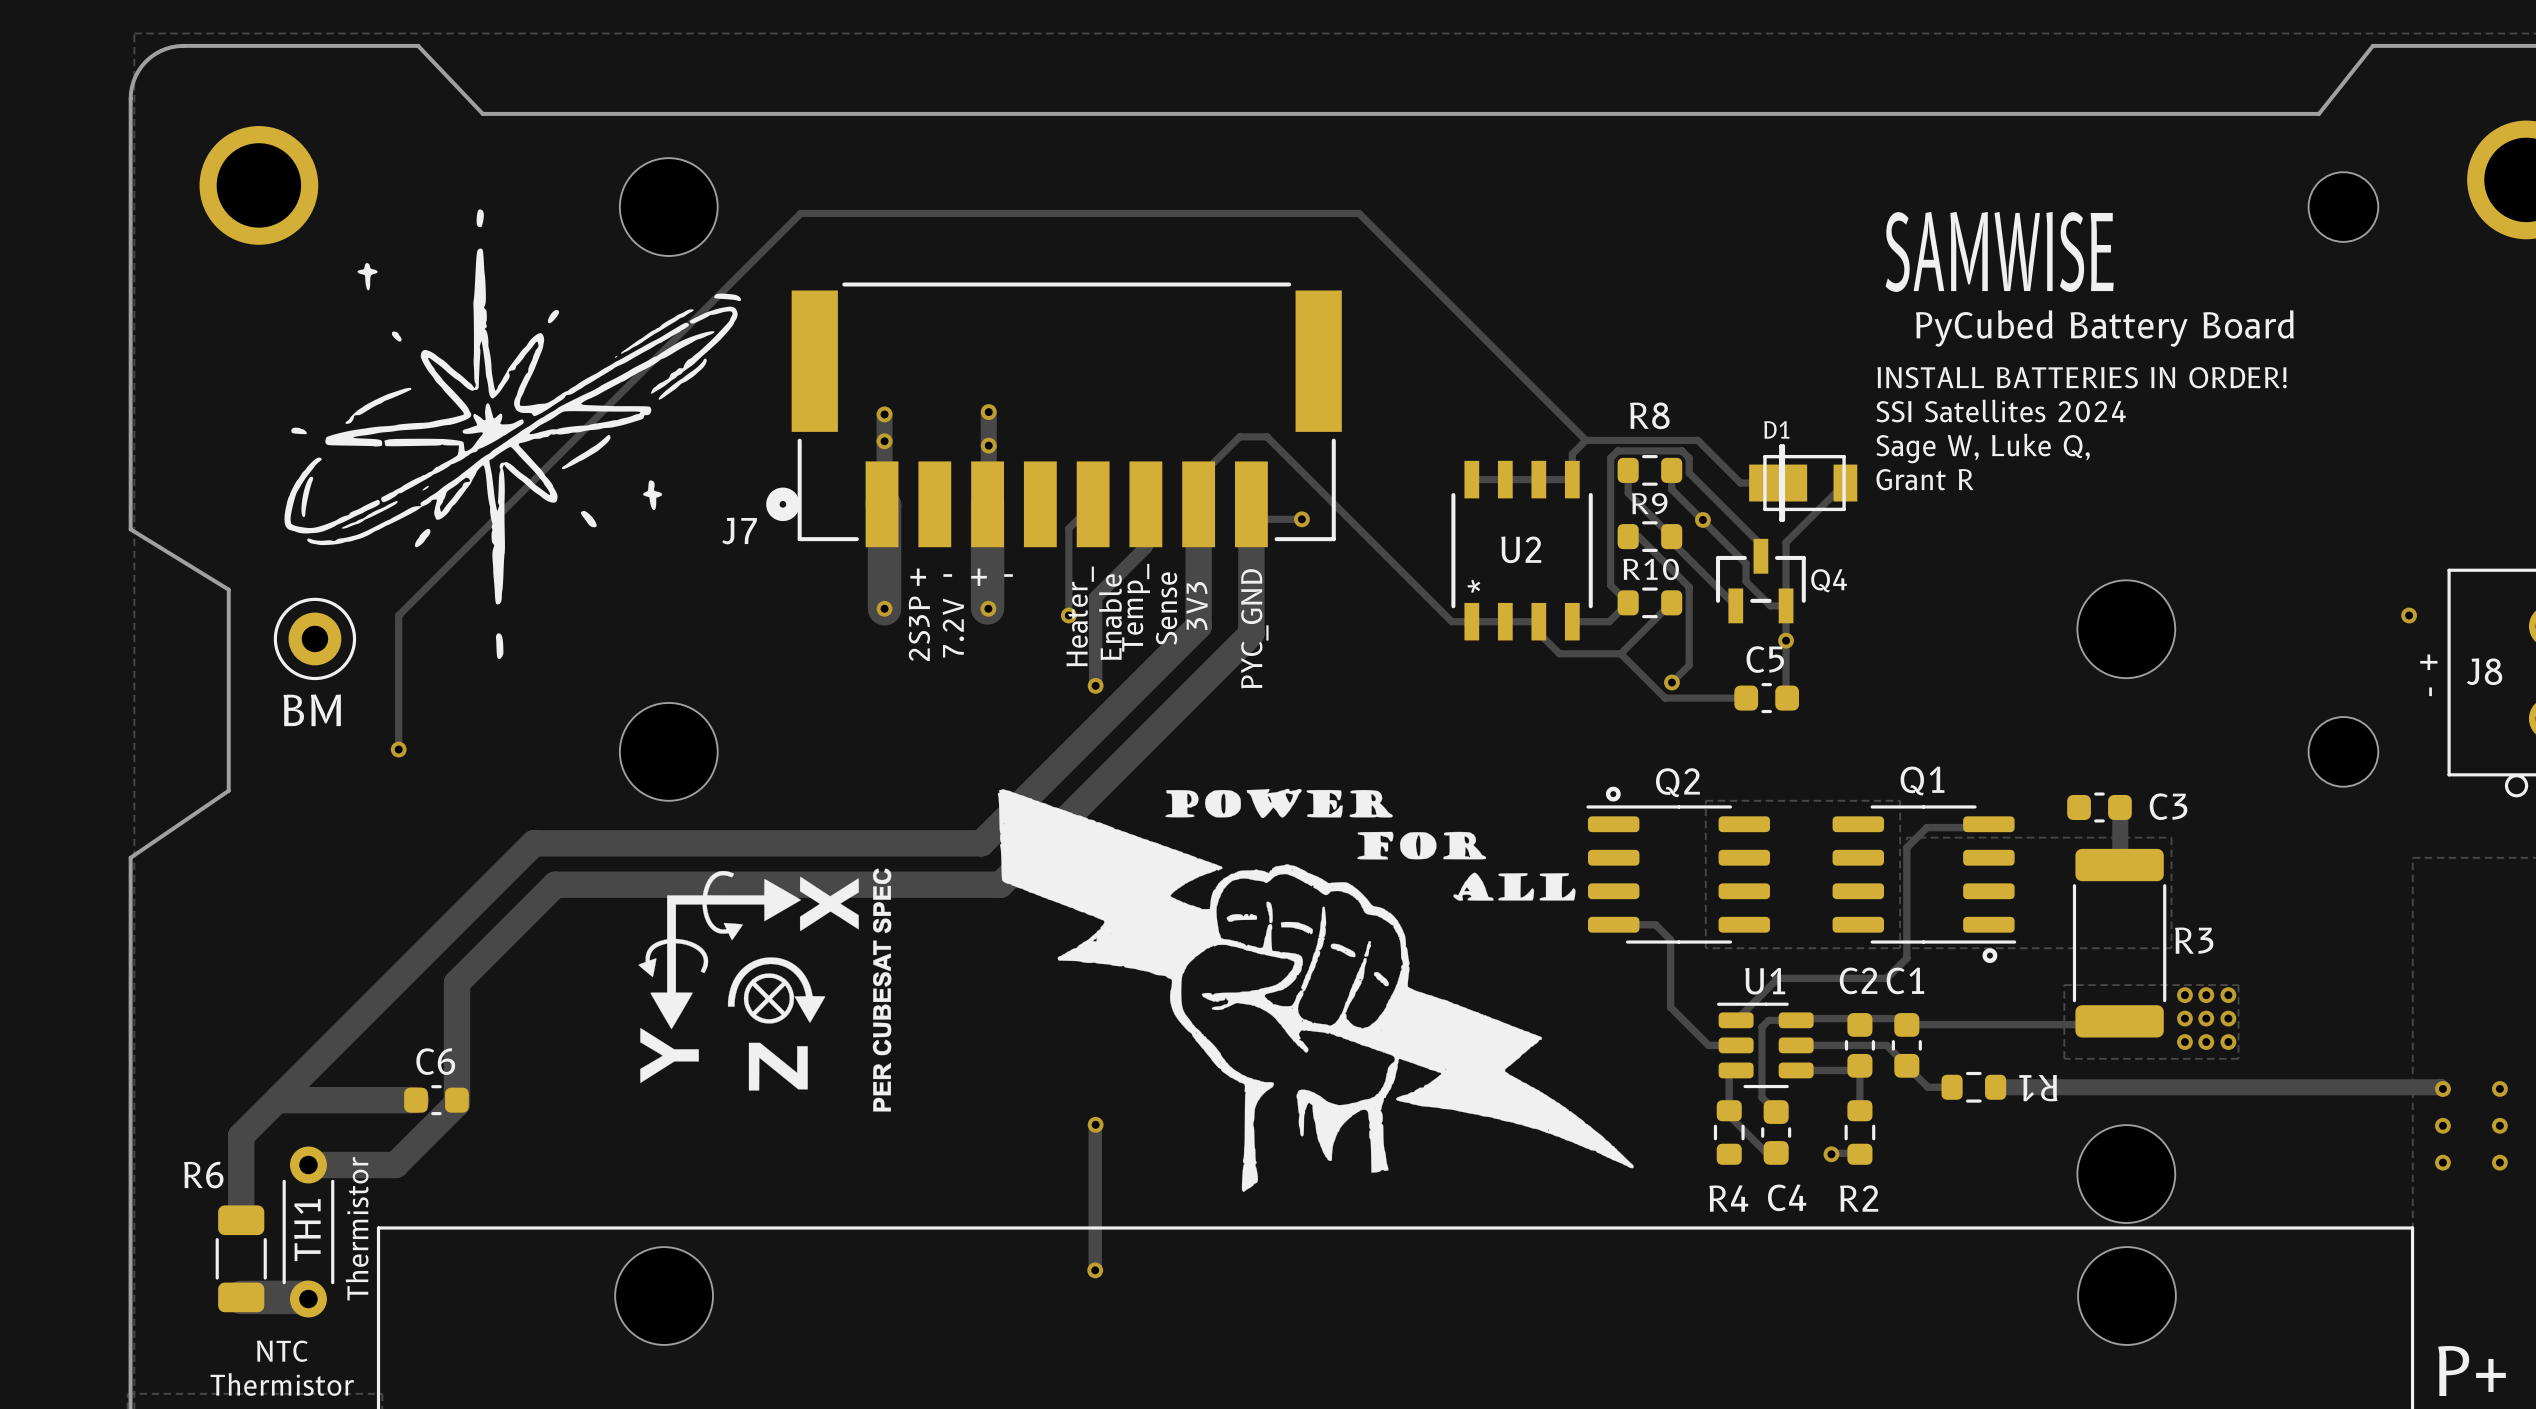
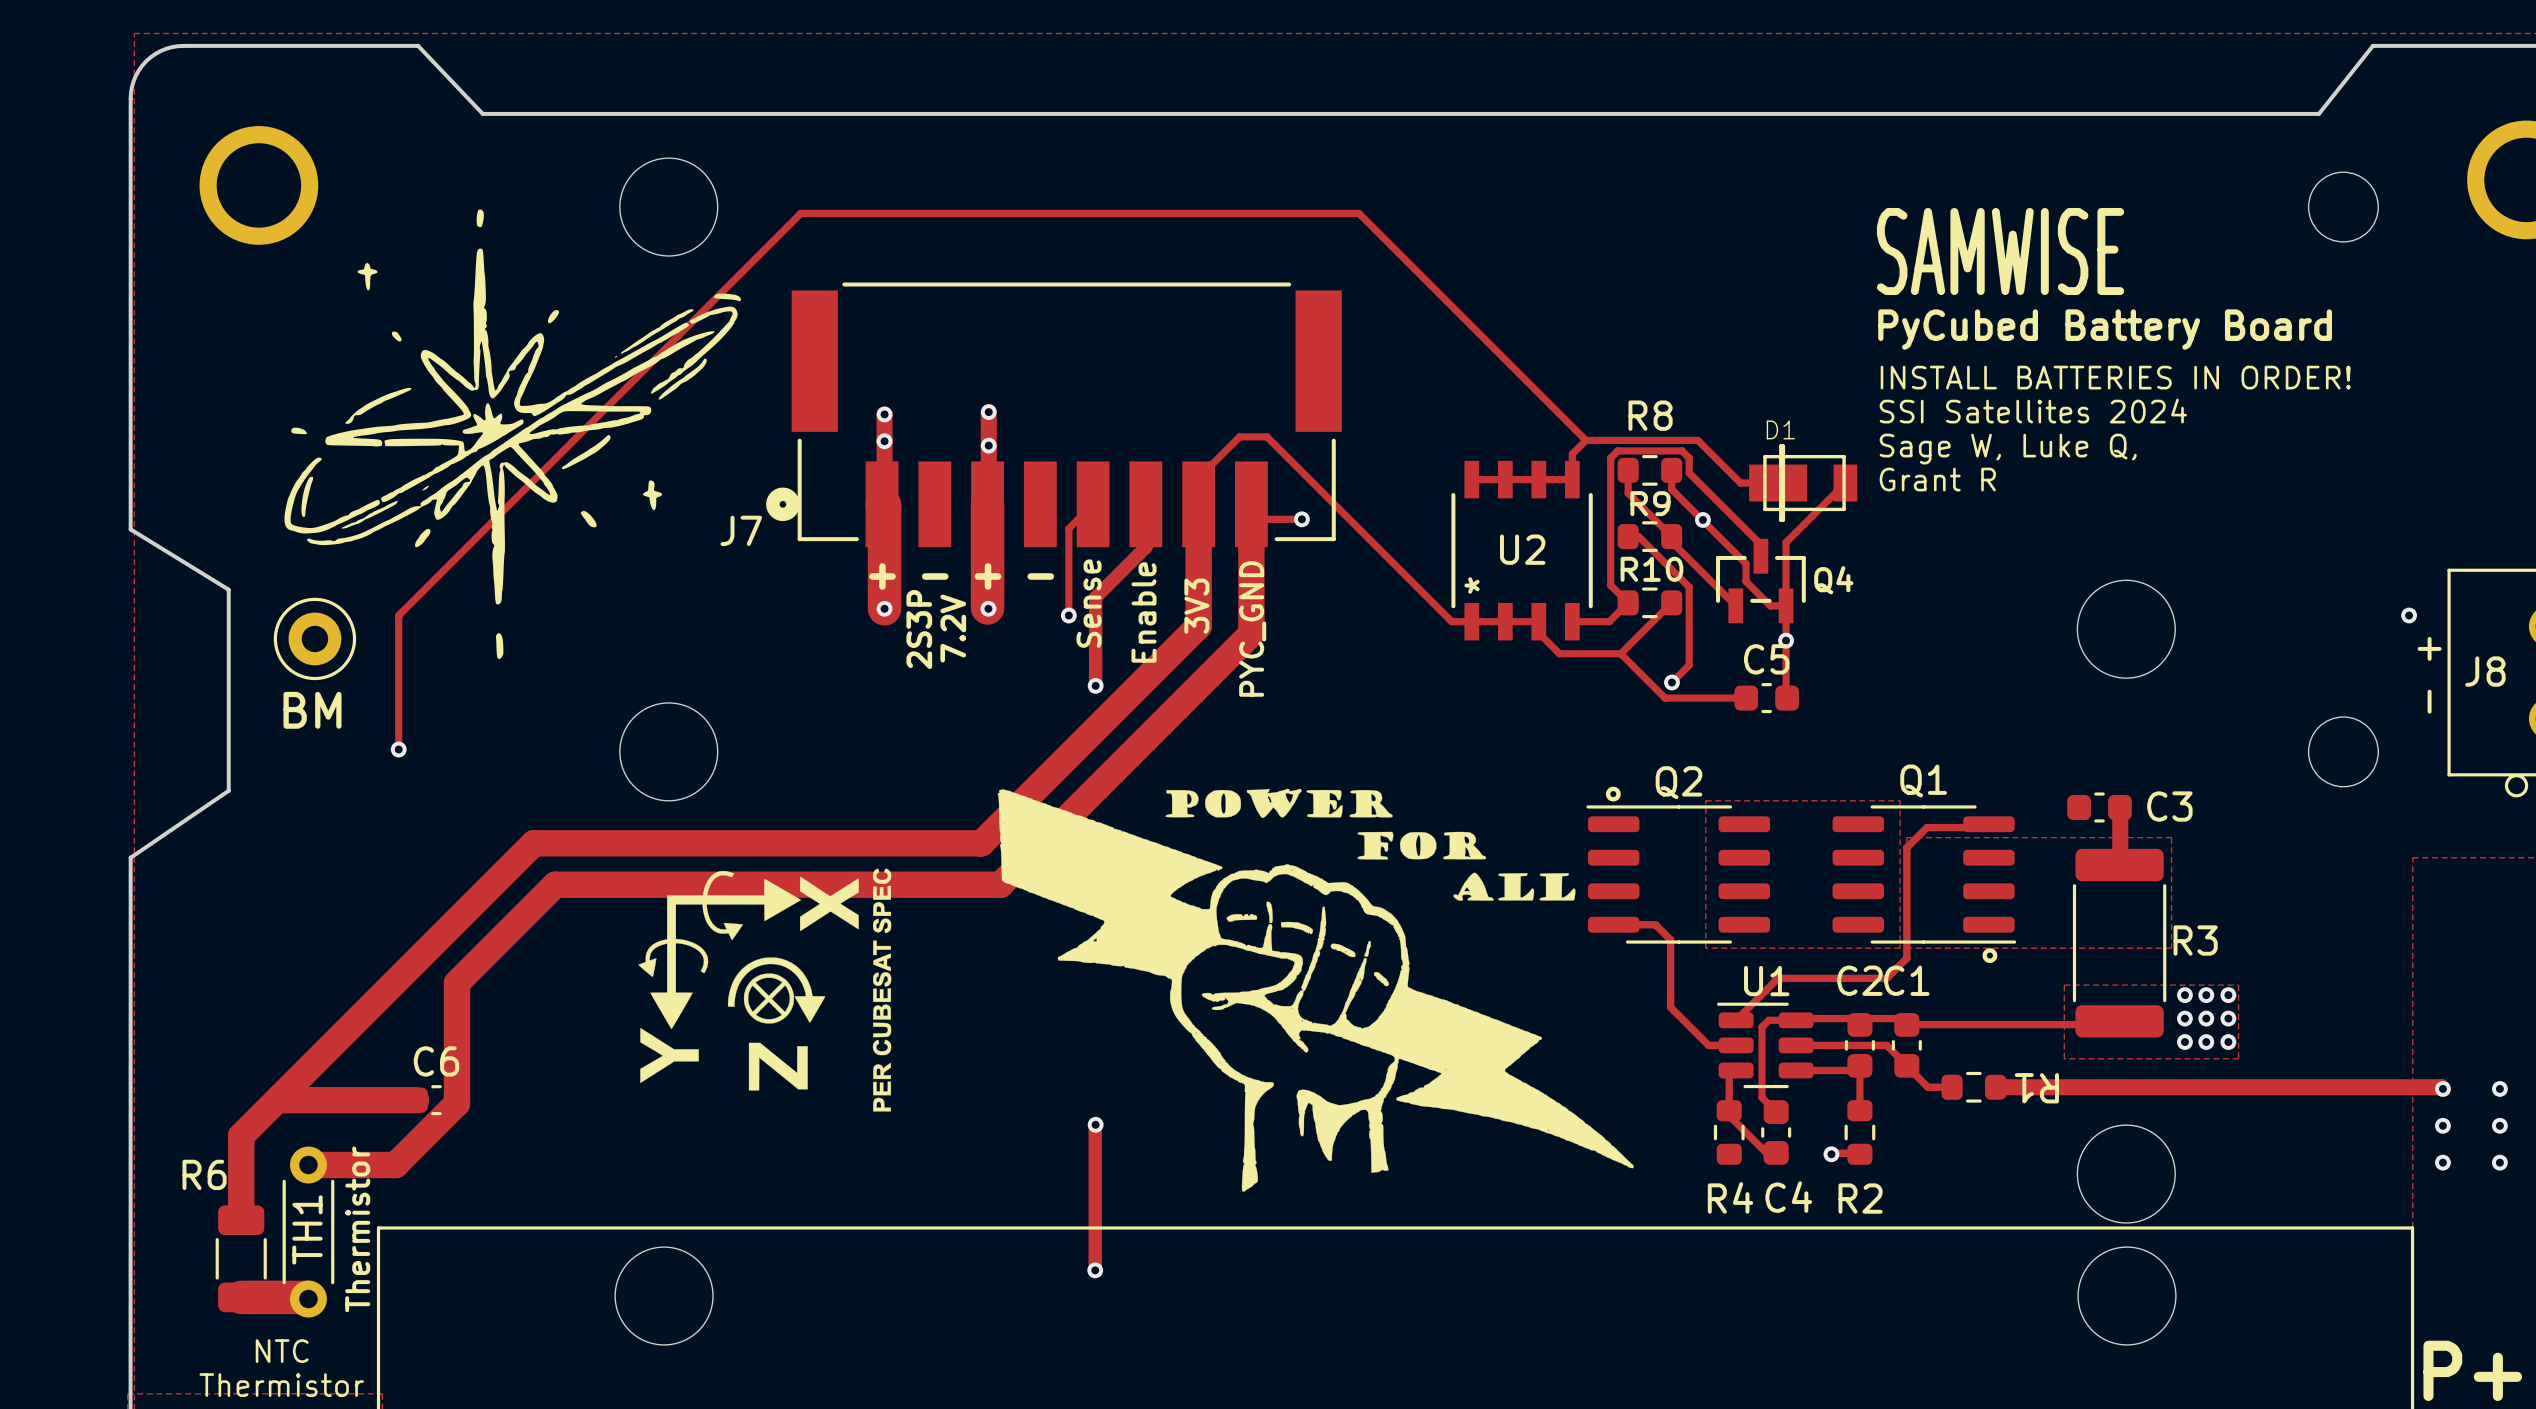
text: Temp_ (1136, 607) -> none
text position: Sense (1166, 608) -> Sense (1089, 603)
text: Heater_ (1080, 616) -> none
text position: Enable (1110, 617) -> Enable (1144, 612)

